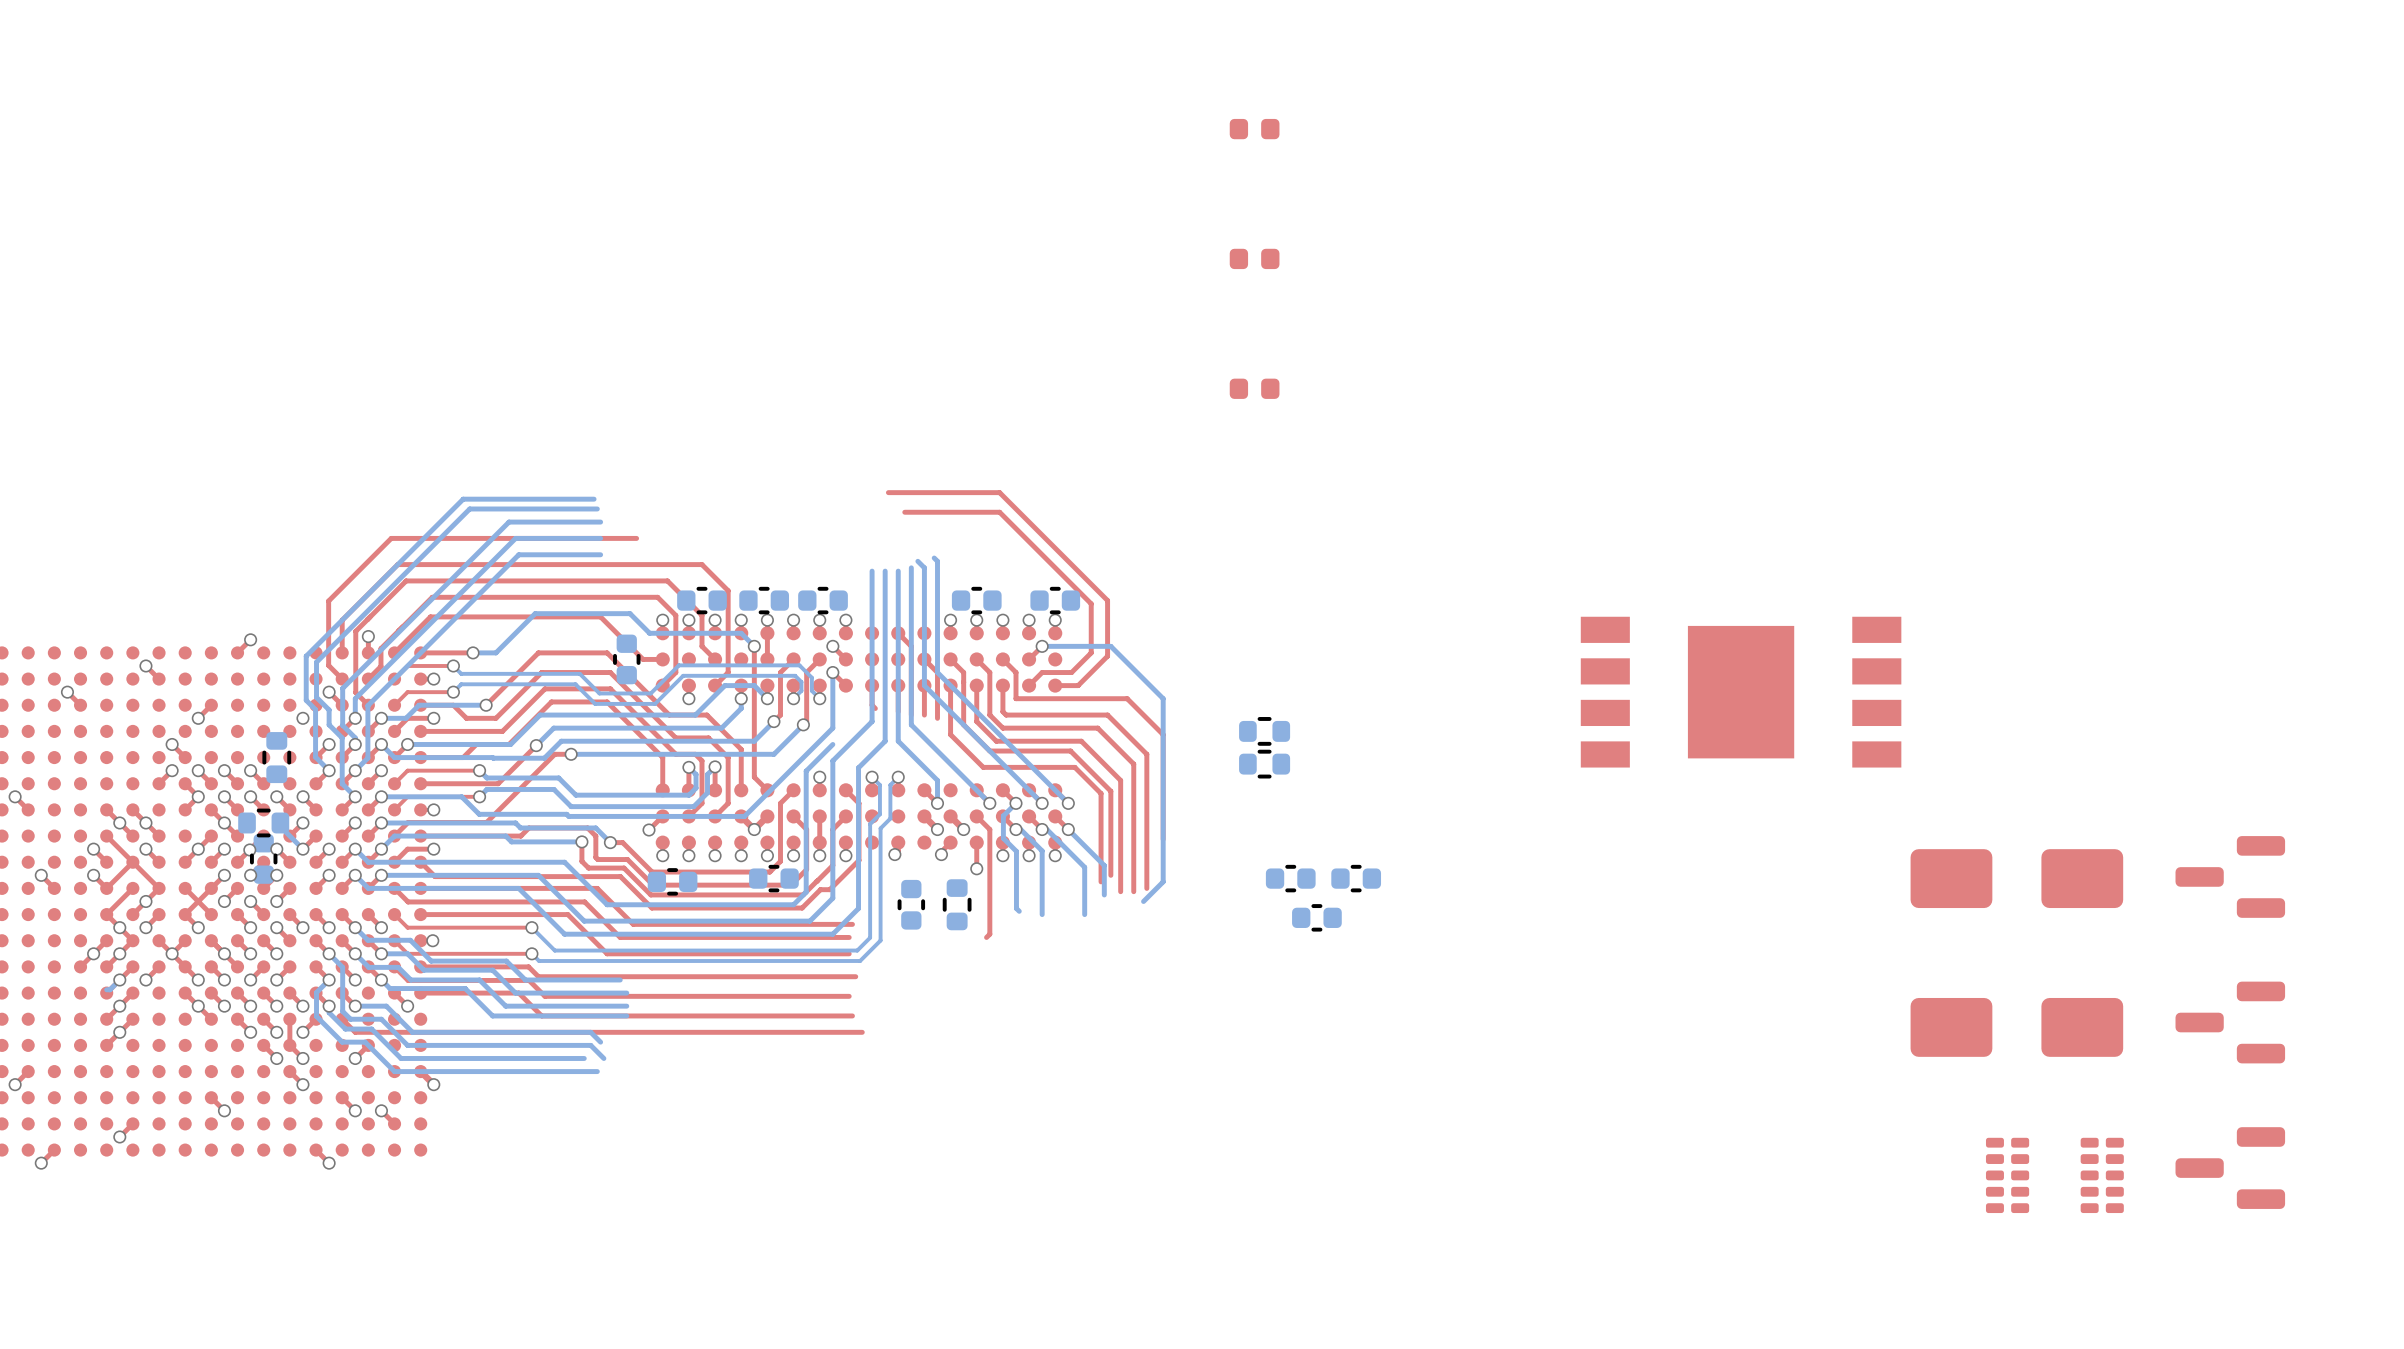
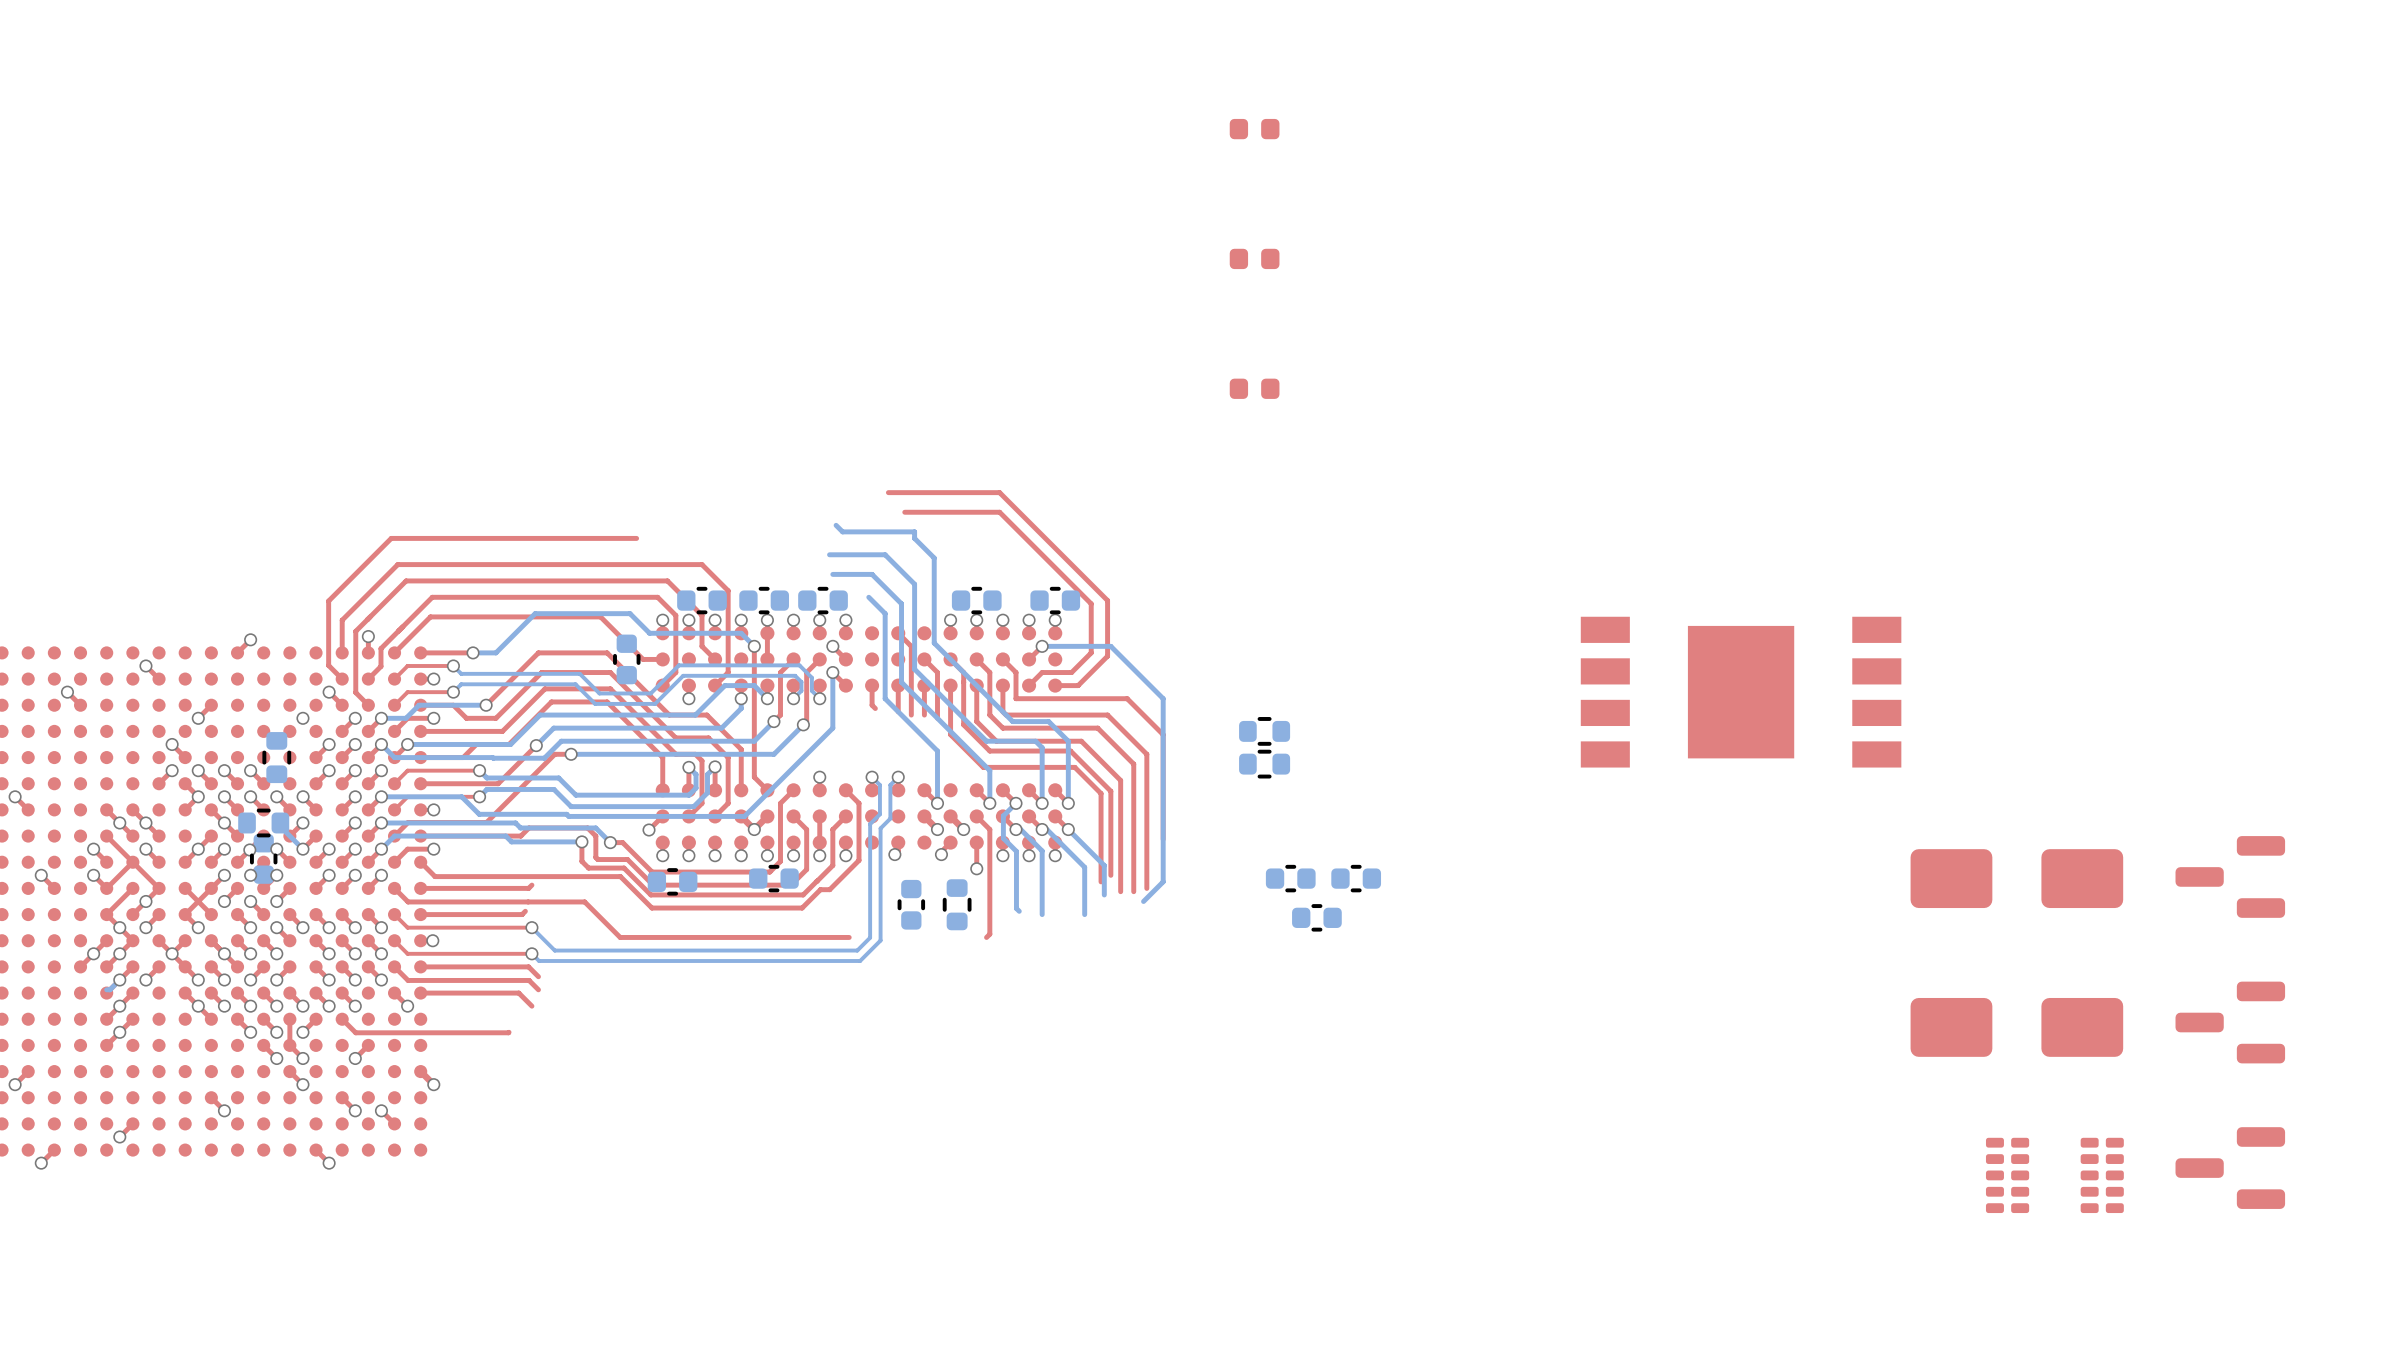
bottom track: (594, 499) (463, 499) (306, 656) (306, 700) (315, 709) (315, 757) (329, 770) -> none
bottom track: (597, 508) (469, 508) (316, 662) (316, 697) (329, 709) (329, 724) (342, 737) (342, 783) (355, 796) -> none
bottom track: (600, 522) (509, 522) (342, 688) (342, 725) (355, 737) (355, 744) -> none
bottom track: (600, 538) (515, 538) (355, 698) (355, 718) -> none
bottom track: (600, 554) (518, 554) (367, 705) (367, 758) (355, 770) -> none
bottom track: (934, 558) (937, 561) (937, 672) (1068, 803) -> (836, 525) (842, 531) (914, 531) (914, 538) (934, 558) (934, 643) (1012, 721) (1048, 721) (1068, 741) (1068, 803)
bottom track: (917, 561) (924, 567) (924, 685) (1042, 803) -> (829, 554) (885, 554) (914, 584) (914, 669) (986, 741) (1035, 741) (1042, 747) (1042, 803)
bottom track: (911, 567) (911, 724) -> (885, 698) (911, 724)
bottom track: (872, 571) (872, 721) (832, 760) (832, 898) (809, 921) (584, 921) (538, 875) (381, 875) -> none
bottom track: (885, 571) (885, 613) -> (868, 597) (885, 613)
bottom track: (898, 571) (898, 741) (937, 780) -> none
bottom track: none -> (832, 574) (872, 574) (901, 603) (901, 682) (989, 770) (989, 803)
bottom track: (885, 698) (885, 741) (858, 767) (858, 908) (832, 934) (564, 934) (518, 888) (368, 888) (355, 875) -> none
bottom track: (832, 744) (806, 771) (806, 892) (793, 904) (607, 904) (564, 862) (368, 862) (355, 849) -> none
bottom track: (937, 751) (989, 803) -> (937, 751) (937, 780)
top track: (528, 888) (597, 888) (633, 924) (852, 924) -> (528, 888) (531, 885)
top track: (522, 914) (567, 914) (607, 953) (849, 953) -> (522, 914) (525, 911)
bottom track: (355, 927) (367, 940) (410, 940) (431, 961) (506, 961) (525, 979) (620, 979) -> none
bottom track: (329, 953) (342, 967) (342, 1011) (350, 1019) (381, 1019) (407, 1045) (590, 1045) (603, 1058) -> none
bottom track: (355, 953) (368, 967) (398, 967) (410, 979) (479, 979) (505, 1006) (626, 1006) -> none
bottom track: (381, 953) (407, 953) (423, 970) (492, 970) (515, 993) (626, 993) -> none
top track: (855, 976) (538, 976) -> none
bottom track: (329, 979) (316, 992) (316, 1016) (342, 1042) (365, 1042) (394, 1071) (597, 1071) -> none
bottom track: (381, 979) (389, 988) (465, 988) (492, 1015) (626, 1015) -> none
top track: (538, 989) (545, 996) (849, 996) -> none
bottom track: (329, 1006) (329, 1012) (345, 1029) (371, 1029) (401, 1058) (584, 1058) -> none
bottom track: (355, 1006) (386, 1006) (412, 1032) (590, 1032) (600, 1042) -> none
top track: (531, 1006) (541, 1015) (852, 1015) -> none
top track: (862, 1032) (355, 1032) -> (509, 1032) (355, 1032)

